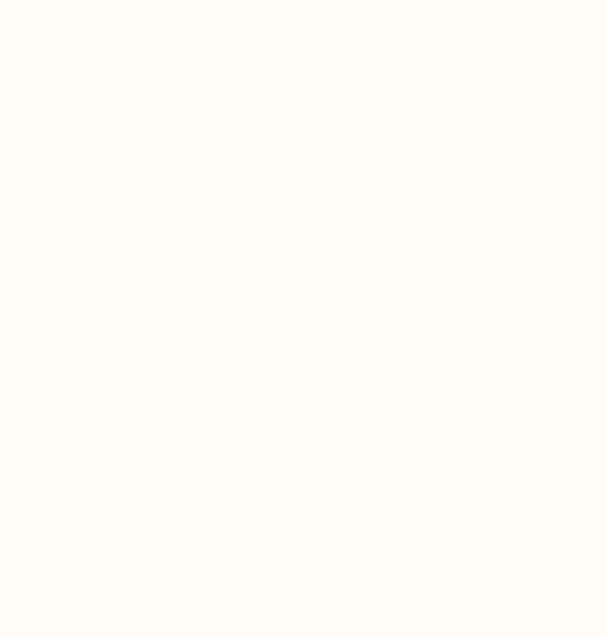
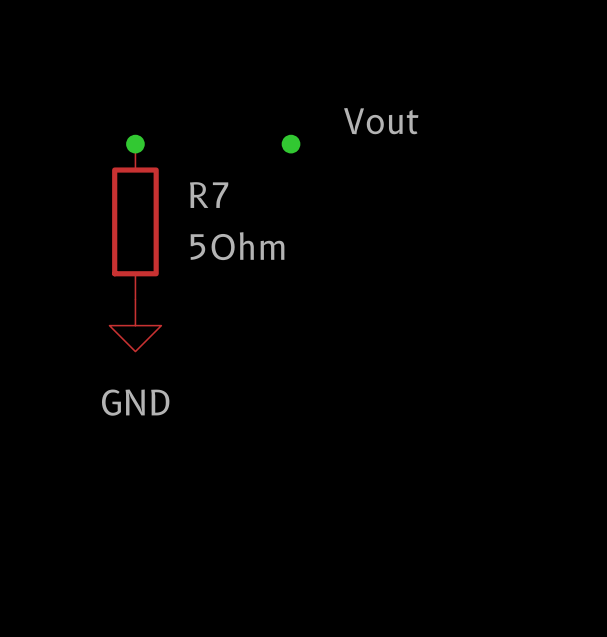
label: none -> Vout (381, 121)
junction: none -> (135, 144)
junction: none -> (291, 144)
R7: none -> 5Ohm (135, 221)
power symbol: none -> GND (135, 325)

